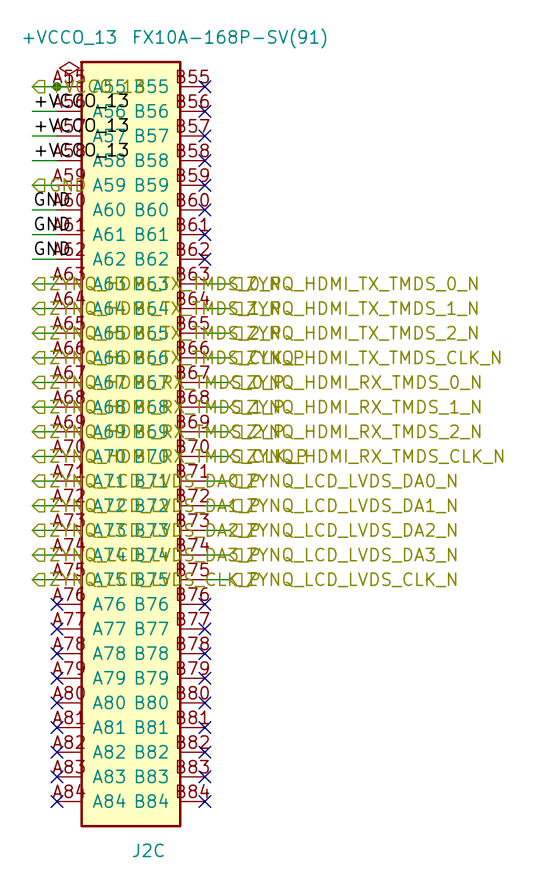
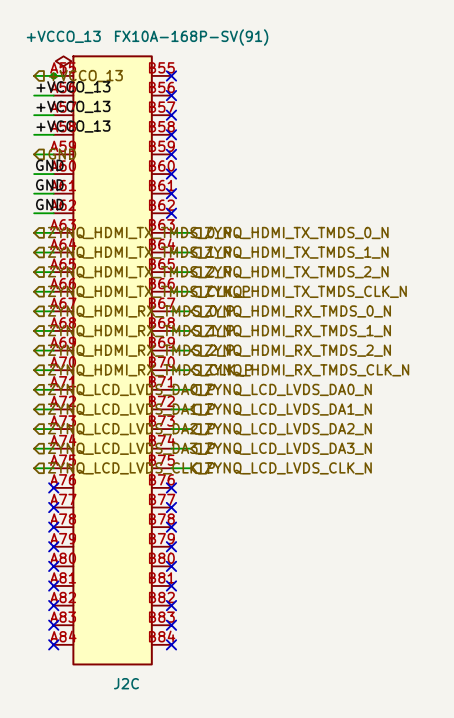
J2C symbol: [56, 60, 205, 828] -> [53, 55, 172, 666]

